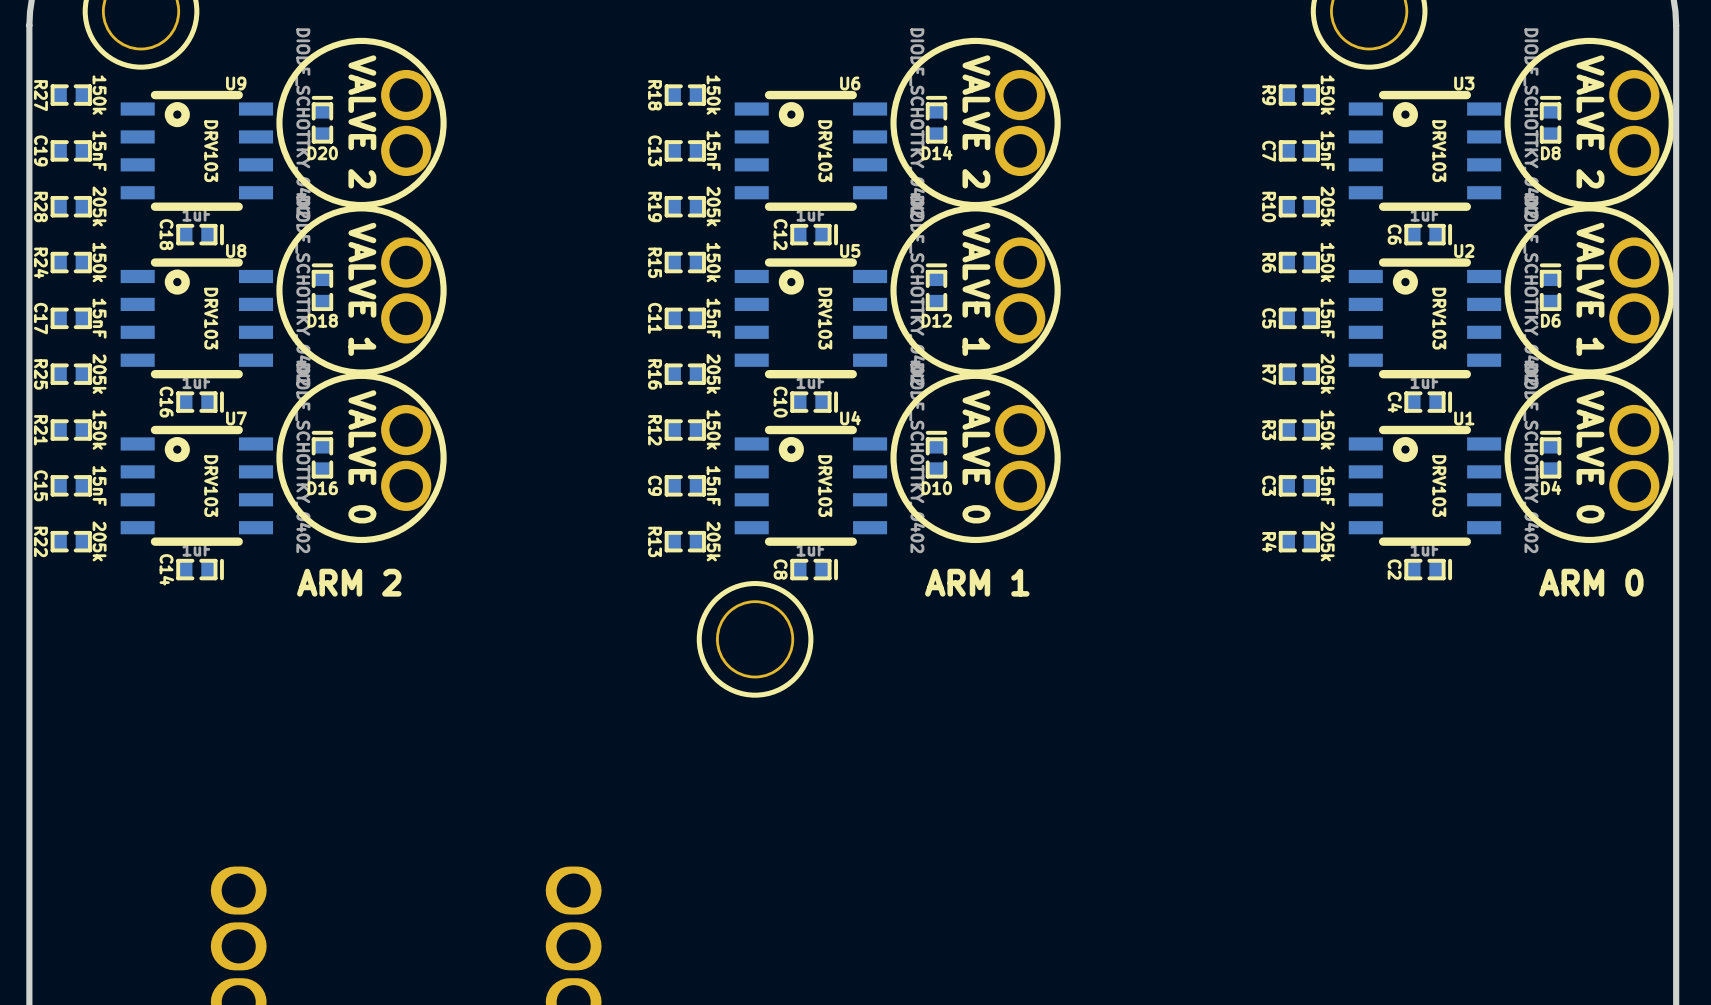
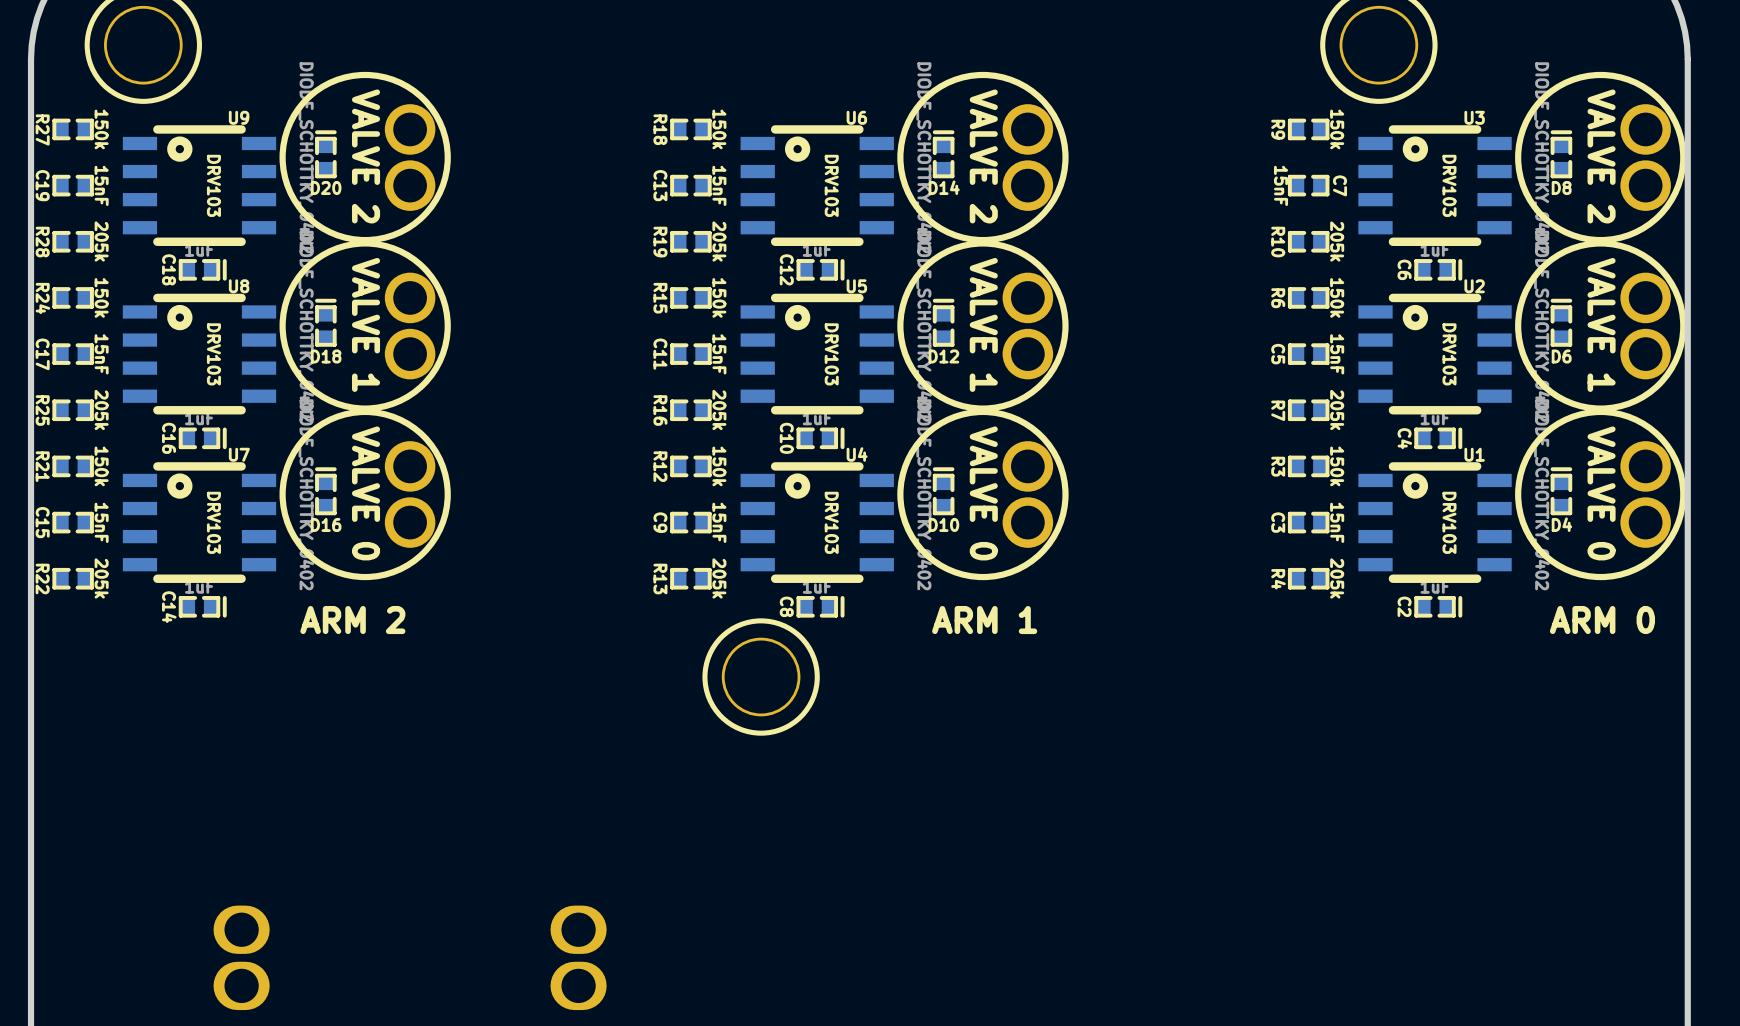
C7 name position: C7 (1269, 151) -> C7 (1339, 185)
C7 value position: 15nF (1327, 151) -> 15nF (1281, 185)

